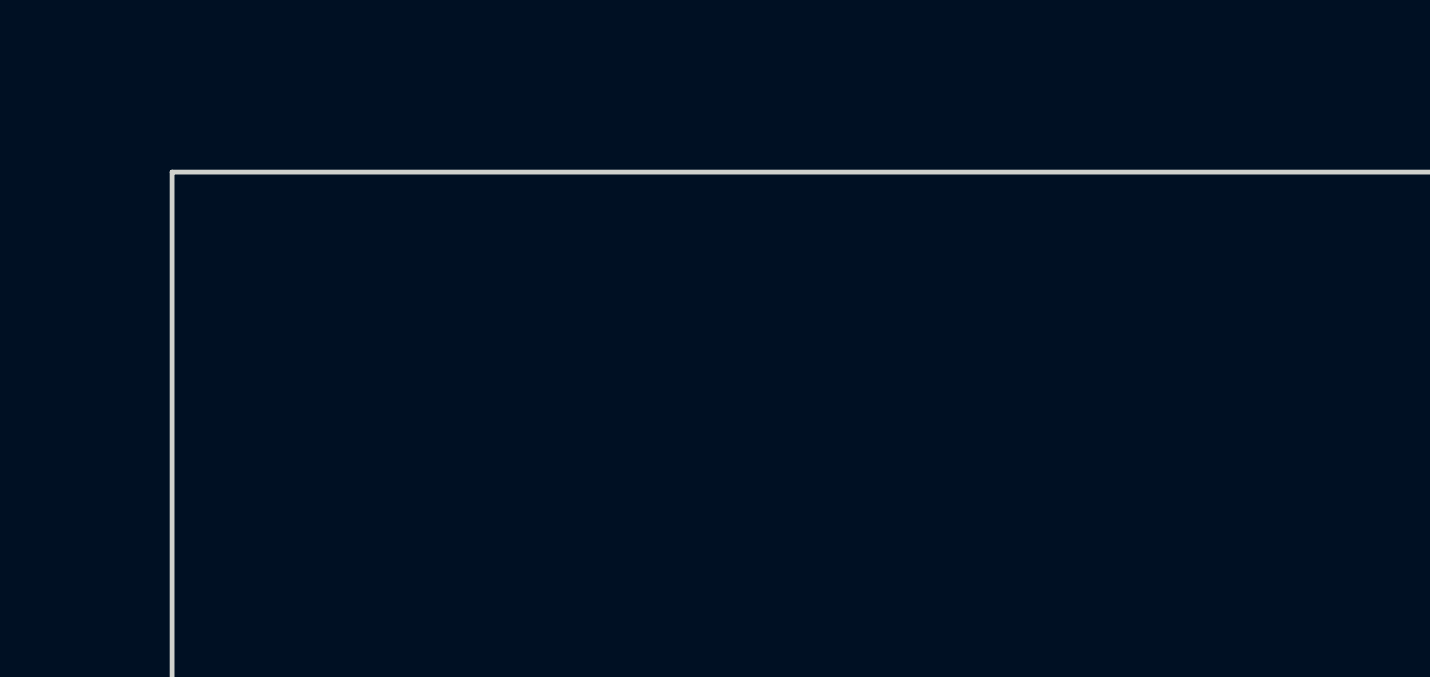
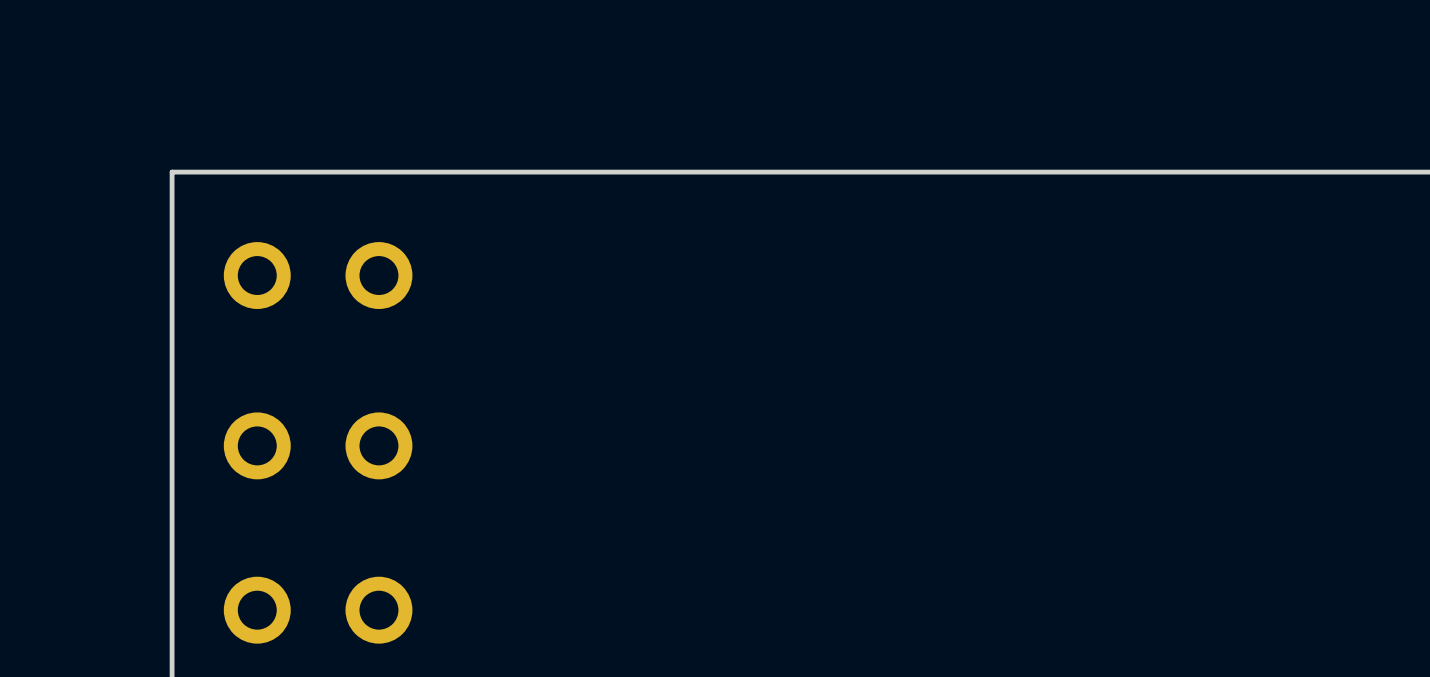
part: none -> (318, 275)
part: none -> (318, 445)
part: none -> (318, 610)

